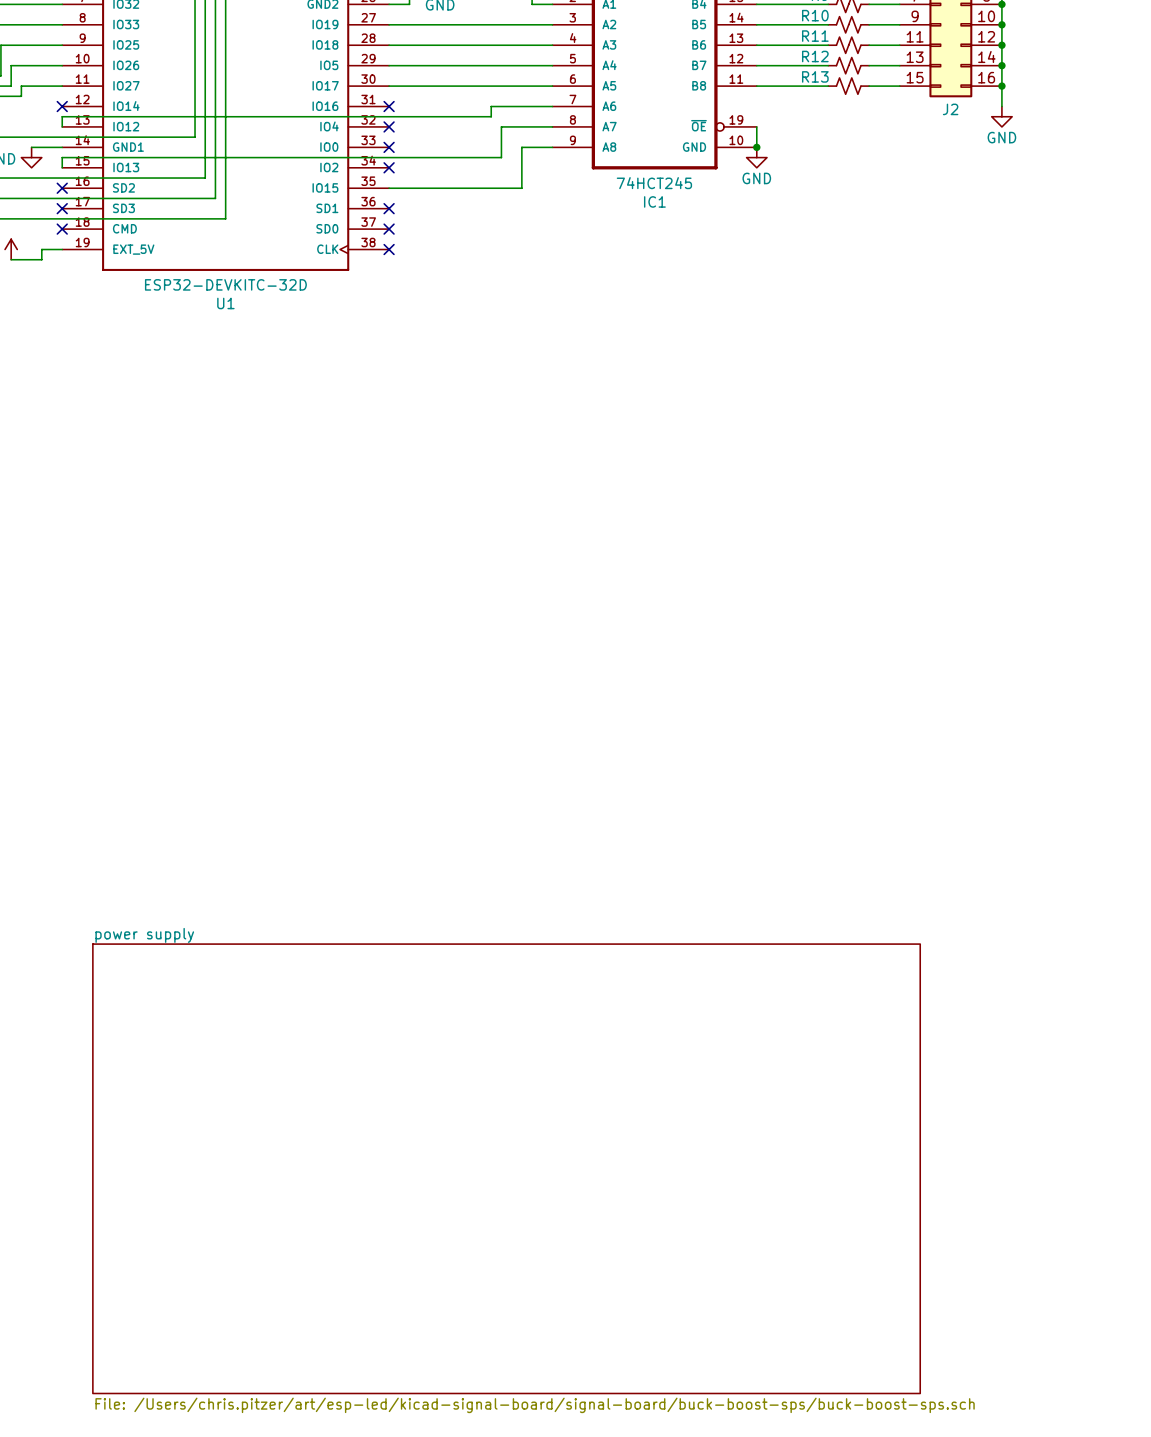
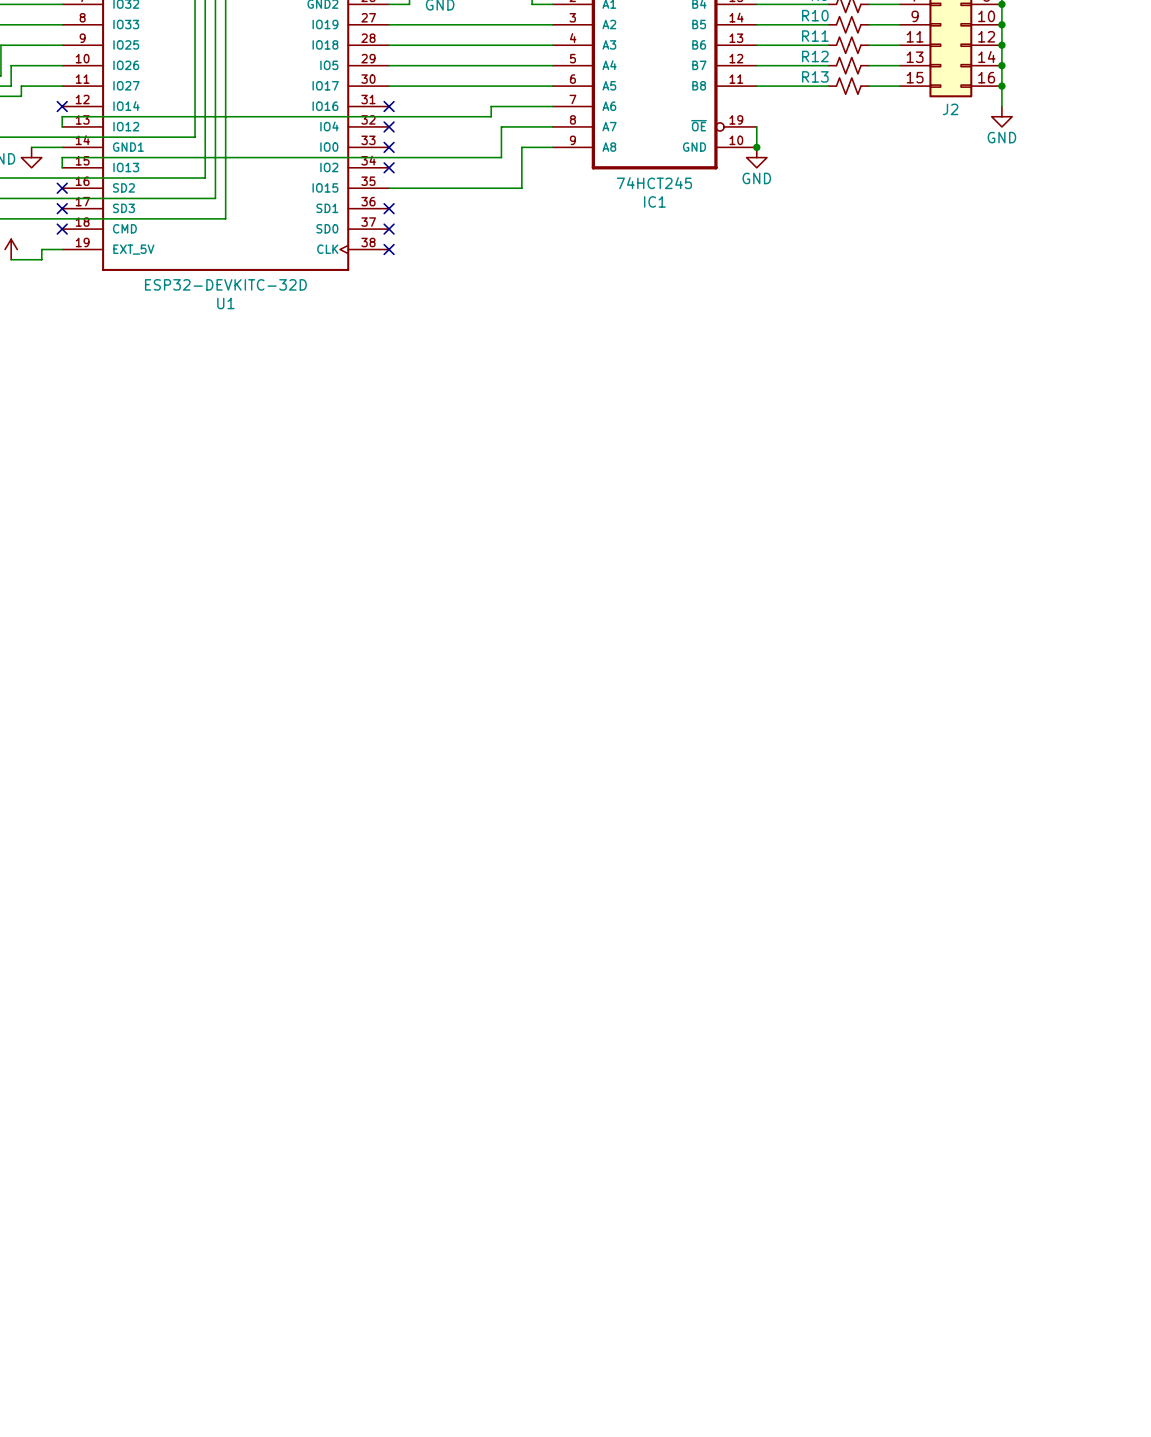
sheet power supply: File: /Users/chris.pitzer/art/esp-led/kicad-signal-board/signal-board/buck-boost-sps/buck-boost-sps.sch (506, 1168) -> none

